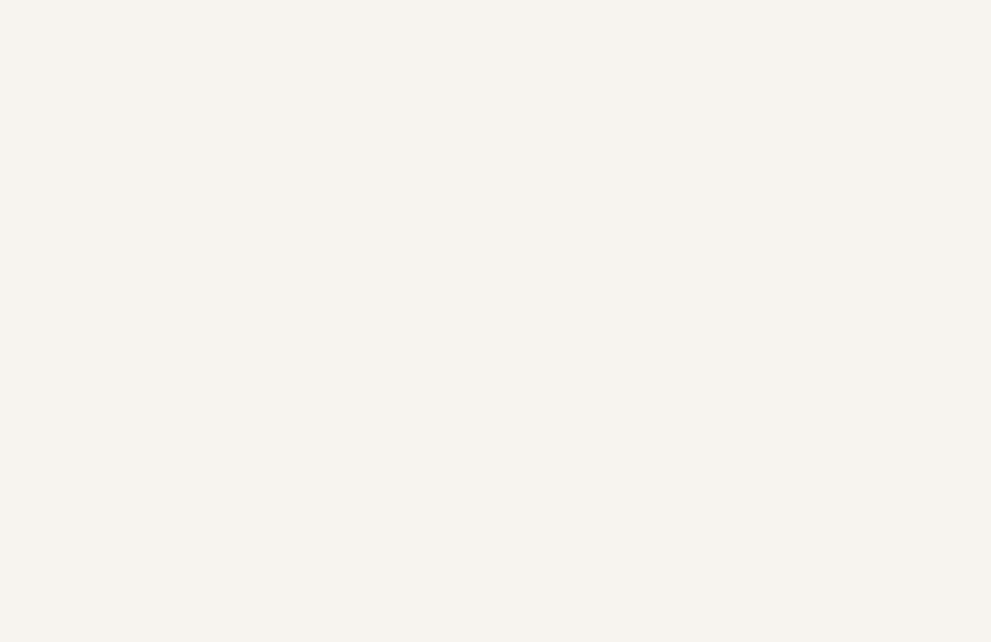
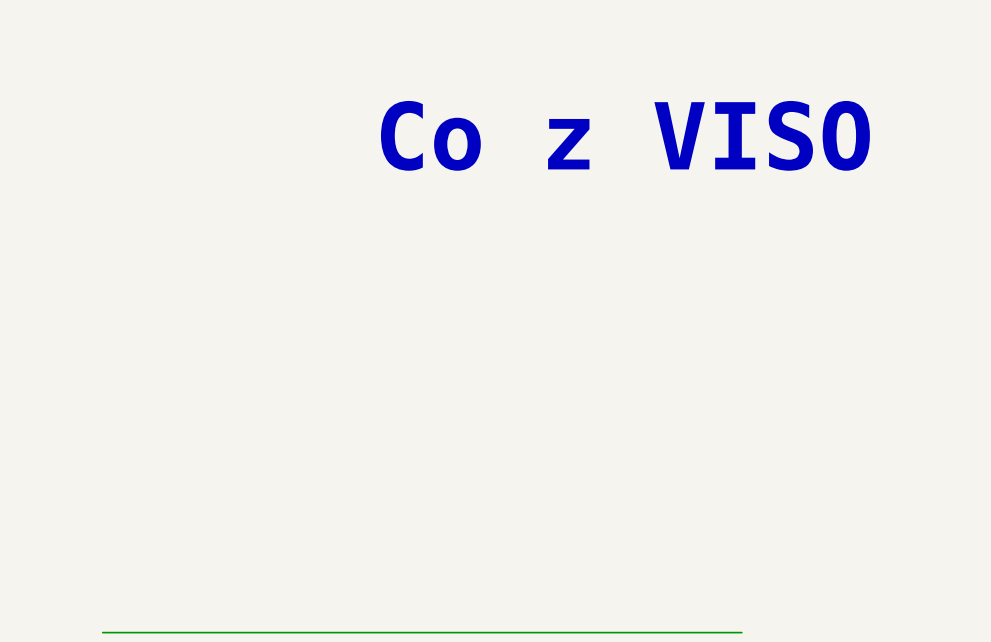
text: none -> Co z VISO (625, 135)
wire: none -> (102, 632) (741, 632)

